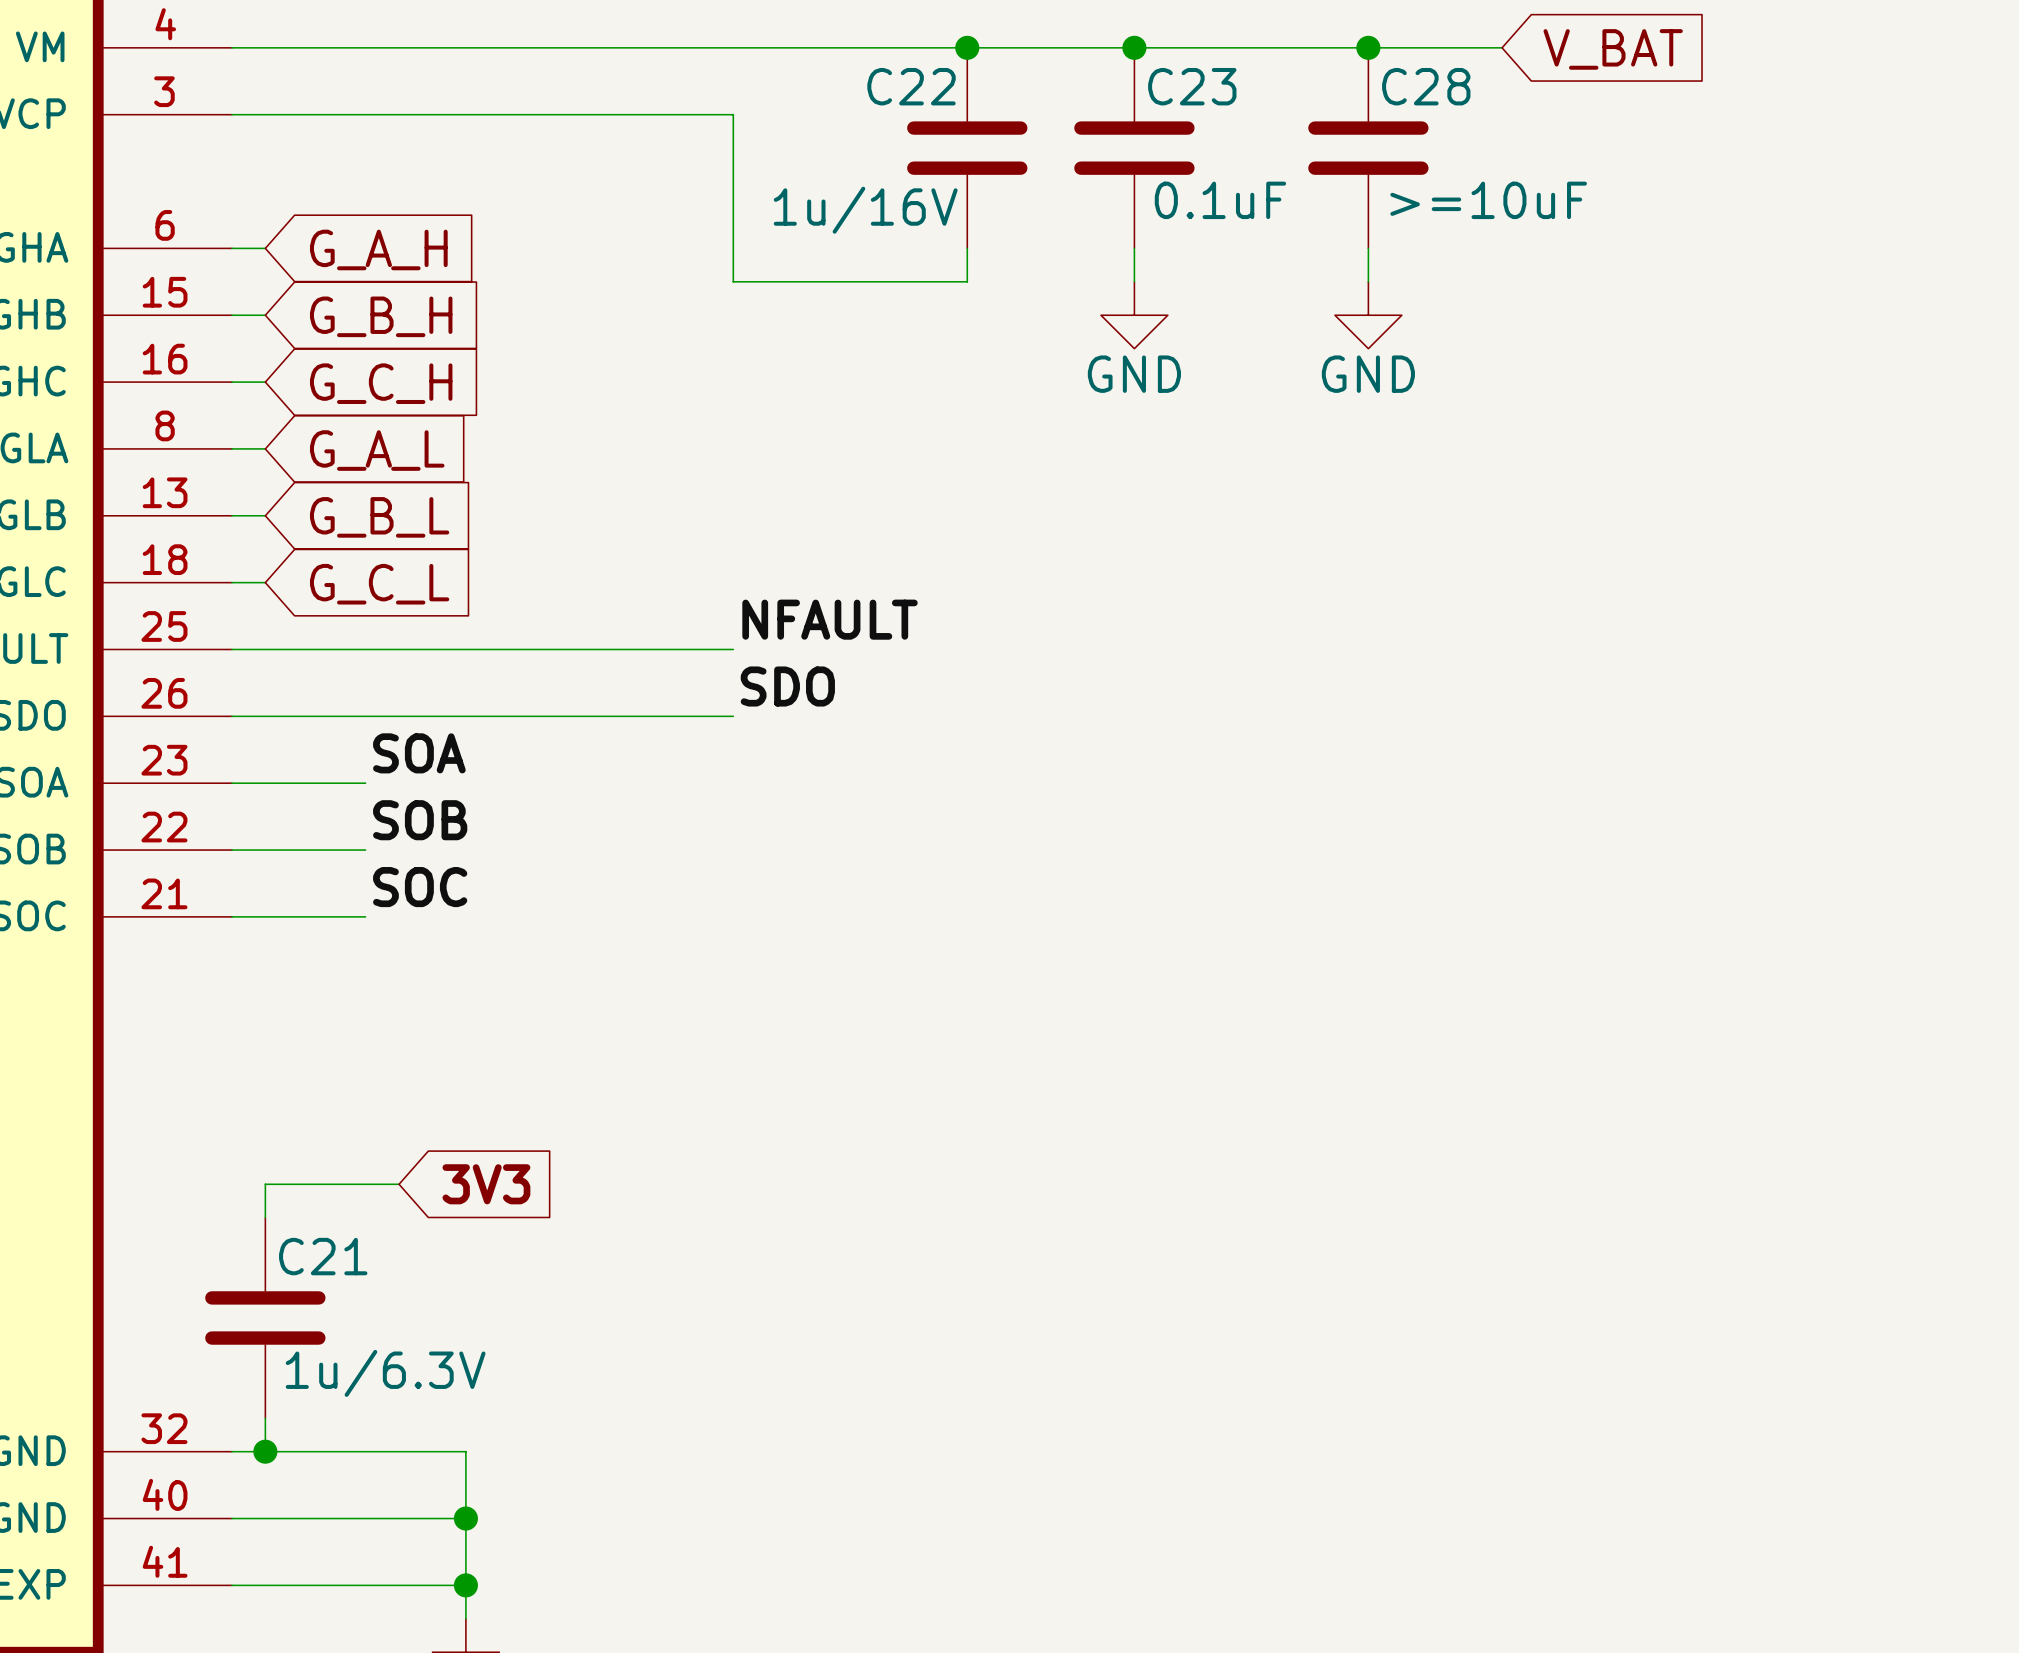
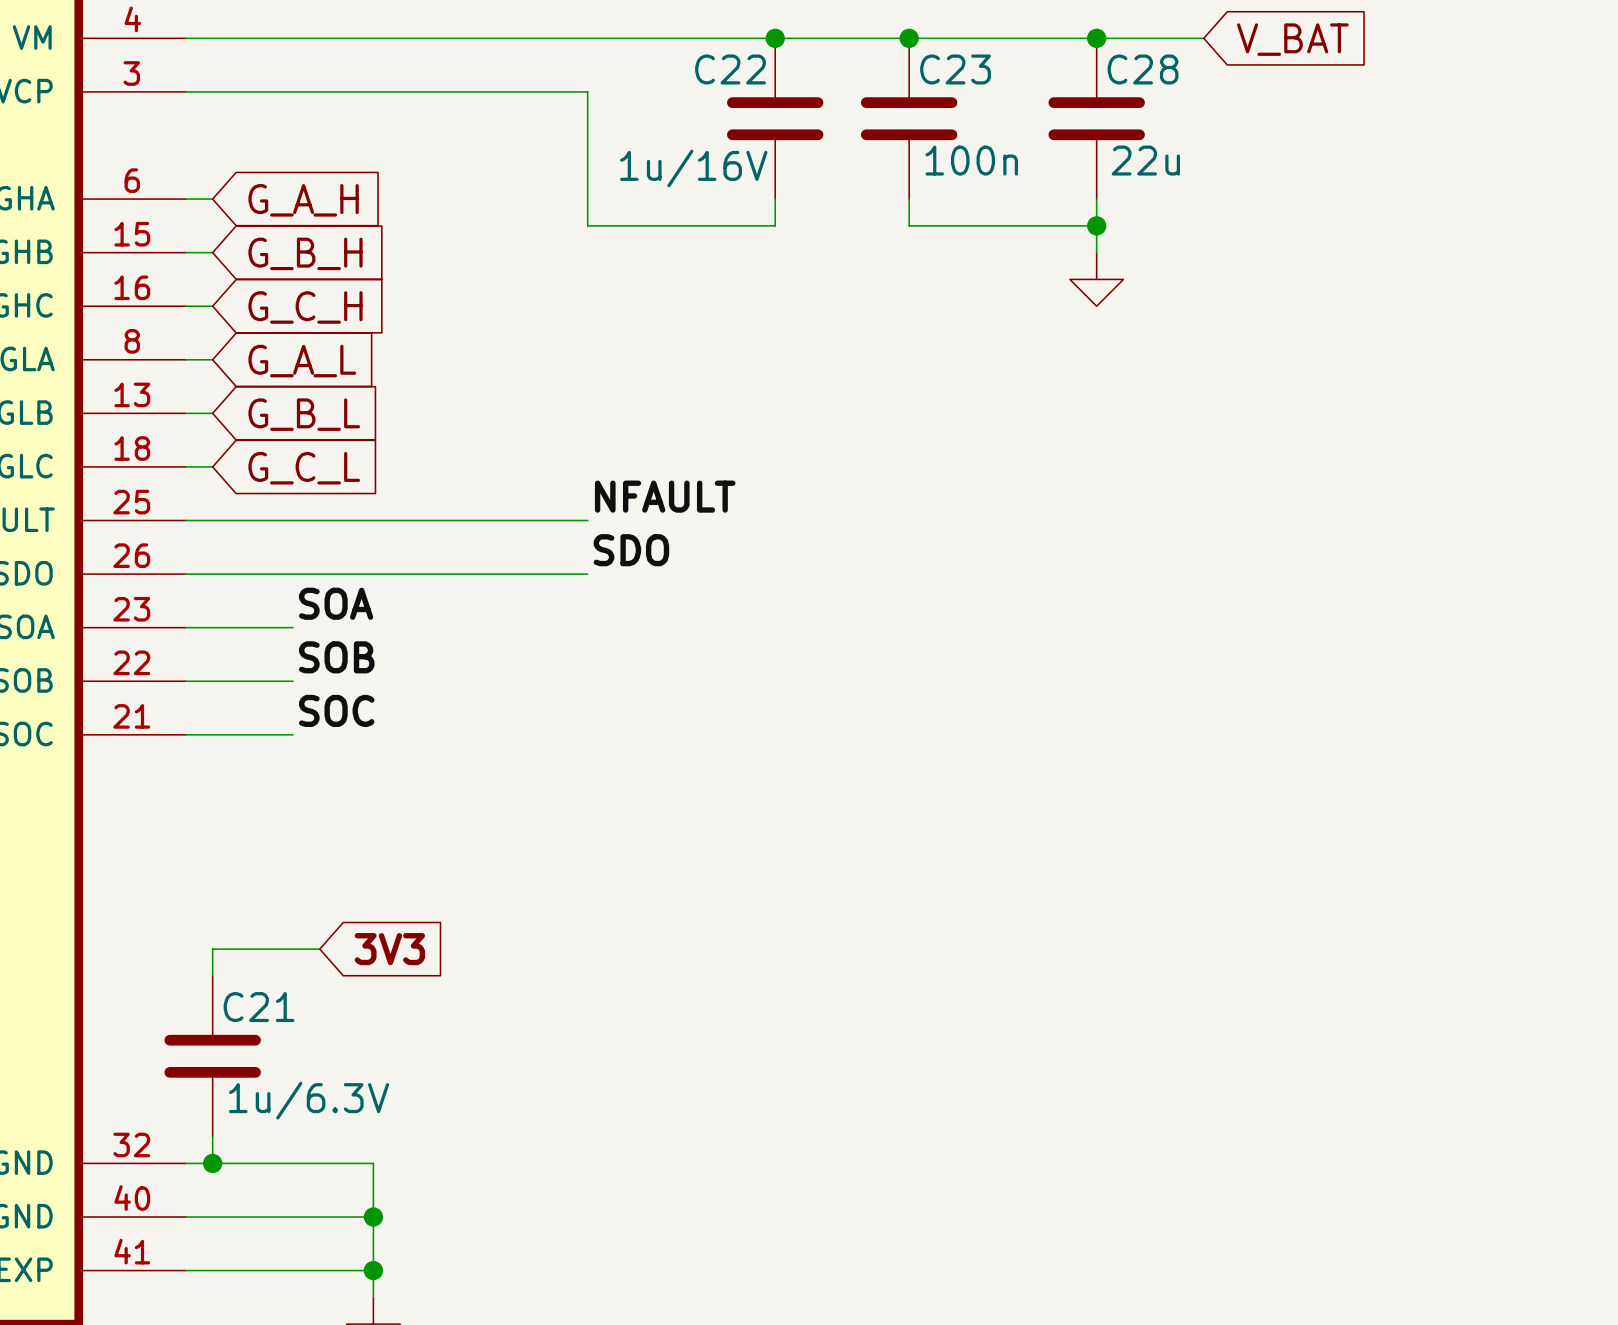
C23 value: 0.1uF (1220, 200) -> 100n (971, 160)
C28 value: >=10uF (1488, 200) -> 22u (1145, 160)
wire: none -> (909, 225) (1096, 225) (1096, 252)
junction: none -> (1096, 225)
power symbol: GND (1134, 315) -> none
power symbol: GND (1368, 315) -> none
power symbol: none -> (1096, 279)

